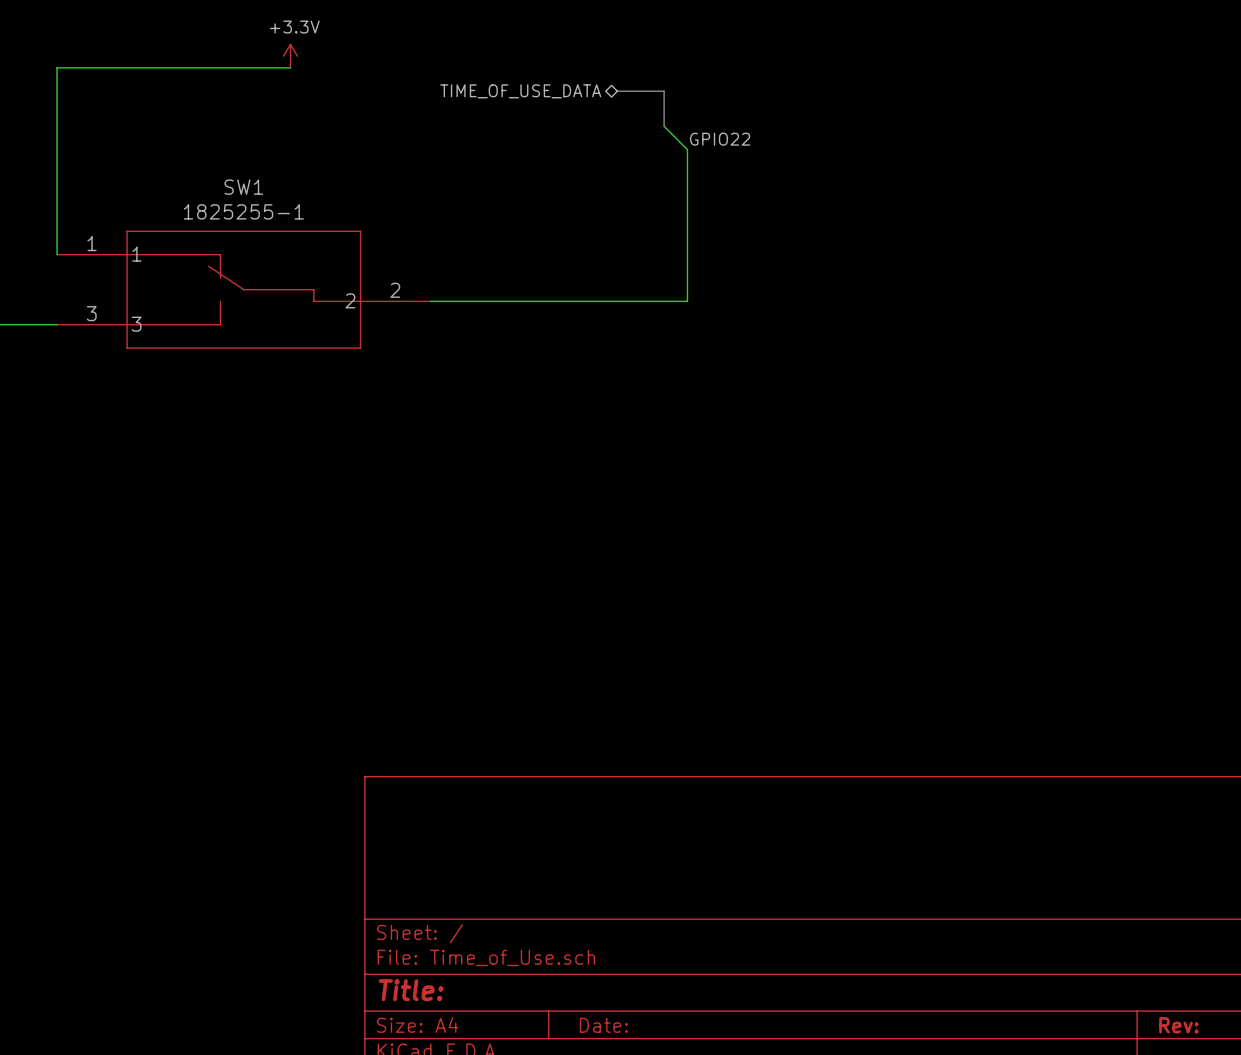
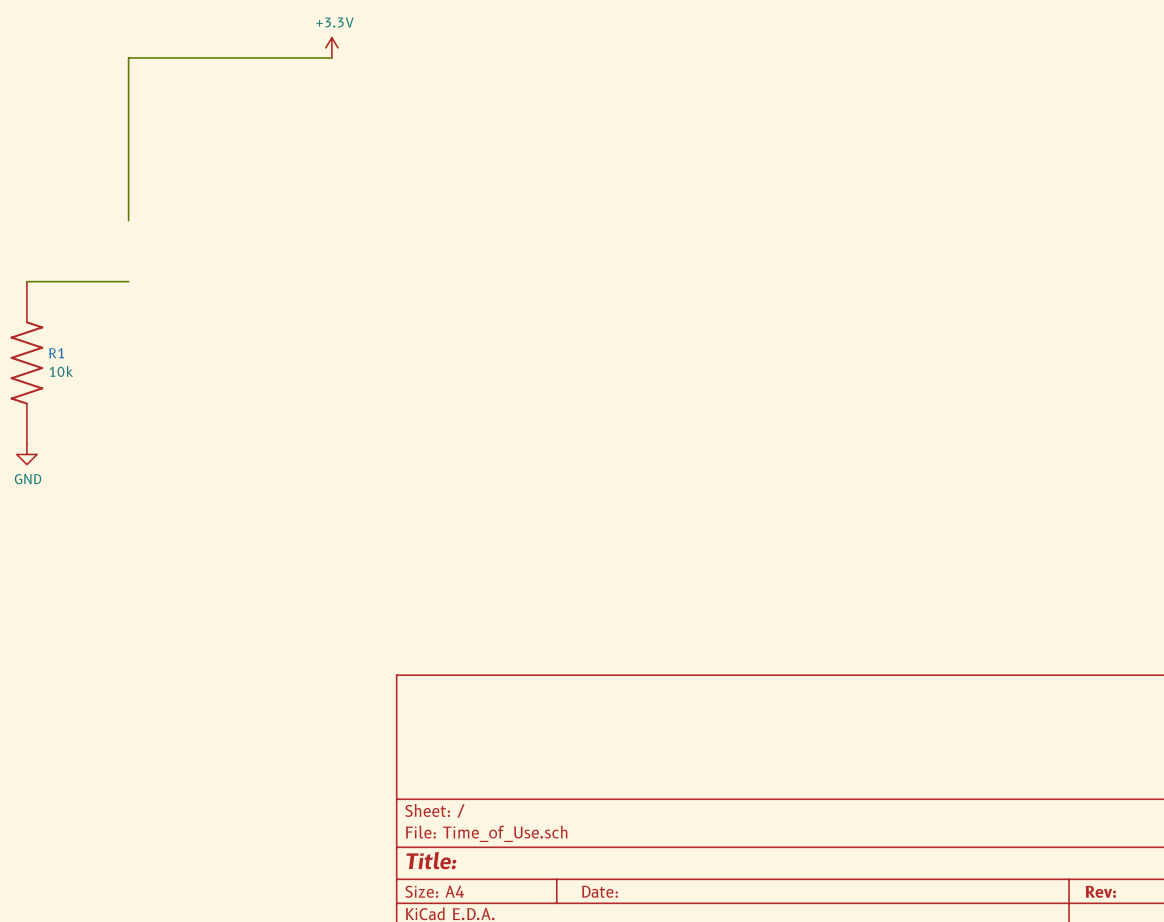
hierarchical label: TIME_OF_USE_DATA (520, 91) -> none
bus: (617, 91) (664, 91) (664, 126) -> none
wire: (664, 126) (687, 149) (687, 301) (430, 301) -> none
label: GPIO22 (720, 139) -> none
SW1: 1825255-1 (243, 289) -> none

